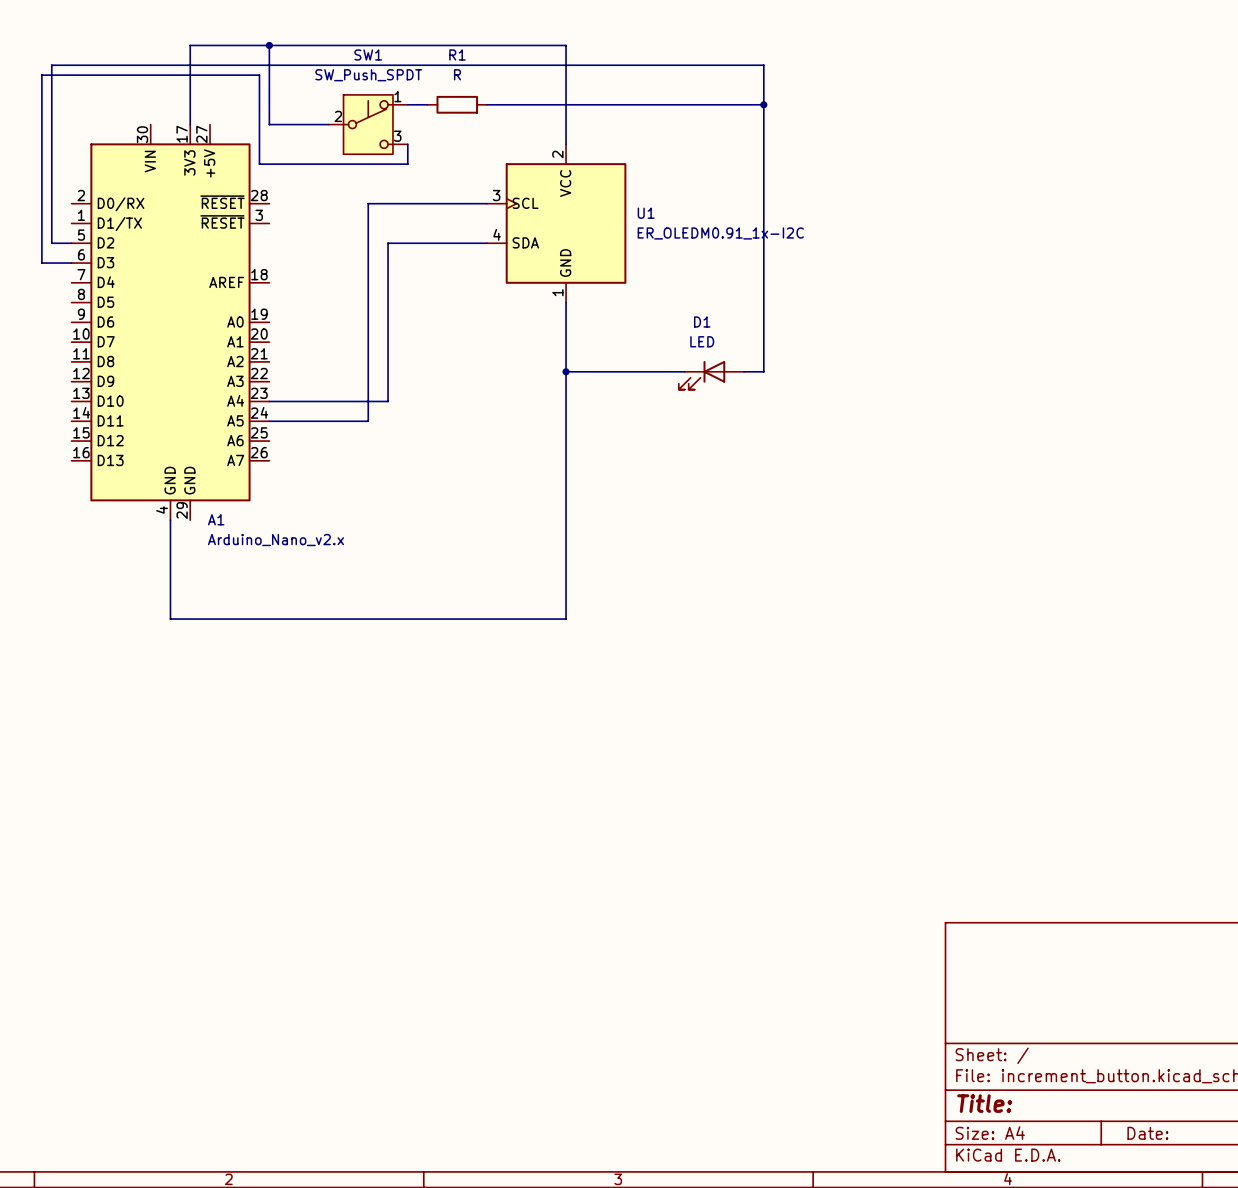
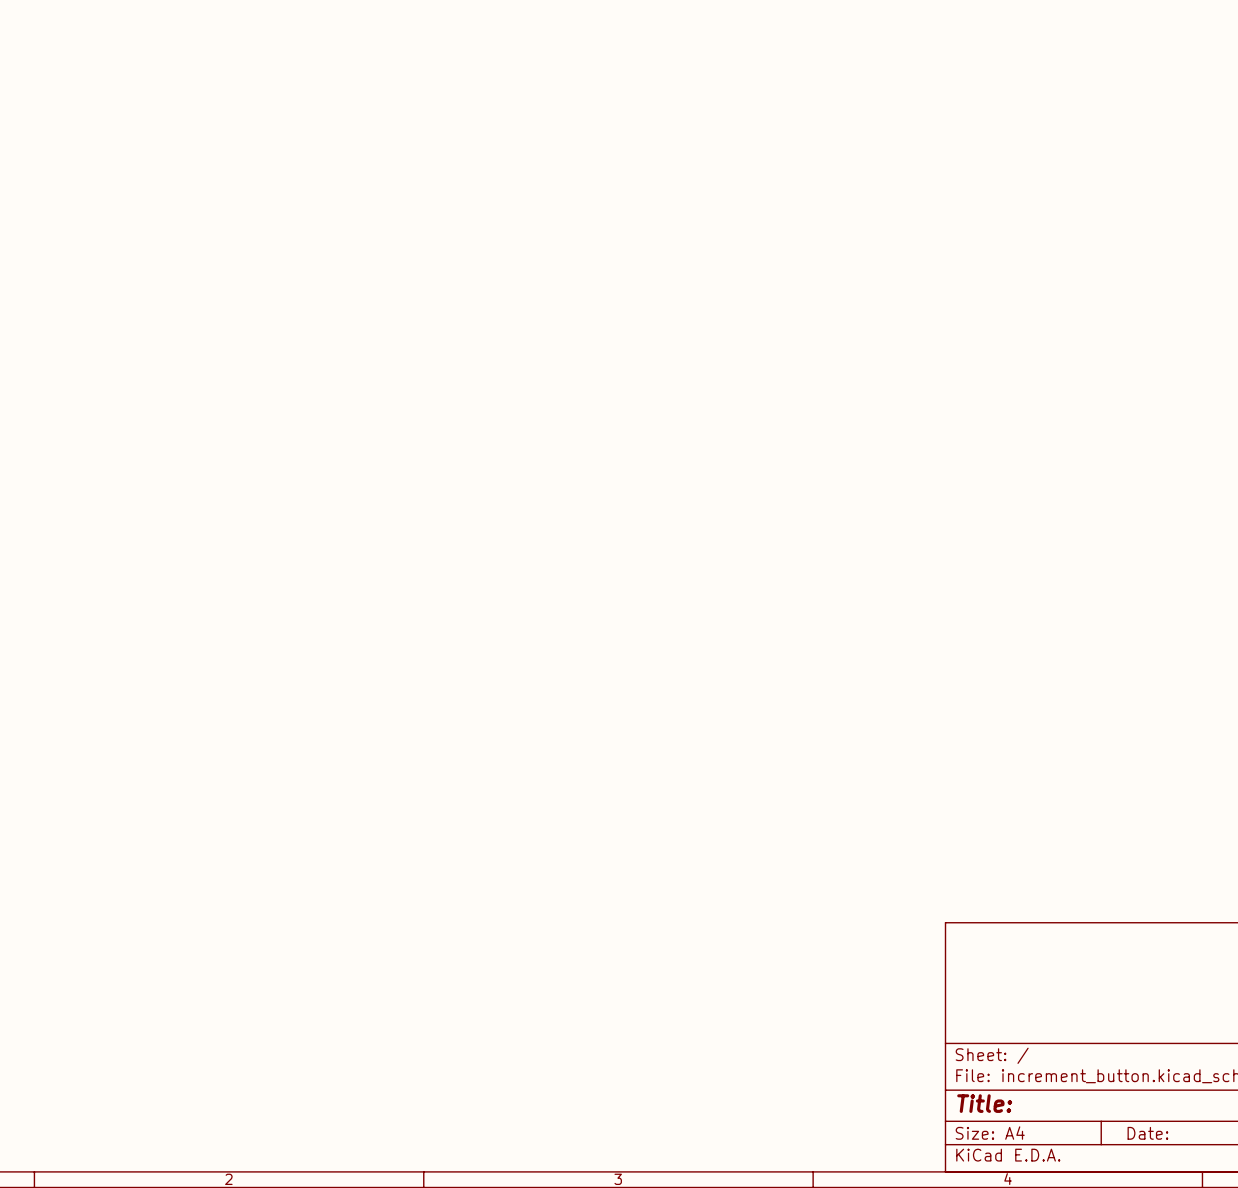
wire: (269, 45) (269, 124) (328, 124) -> none
junction: (269, 45) -> none
wire: (407, 104) (427, 104) -> none
R1: R (457, 104) -> none
wire: (486, 104) (763, 104) -> none
junction: (763, 104) -> none
wire: (190, 124) (190, 45) (566, 45) (566, 144) -> none
SW1: SW_Push_SPDT (368, 124) -> none
wire: (407, 144) (407, 164) (259, 164) (259, 75) (41, 75) (41, 263) (71, 263) -> none
wire: (486, 203) (368, 203) (368, 421) (269, 421) -> none
U1: ER_OLEDM0.91_1x-I2C (556, 223) -> none
wire: (71, 243) (51, 243) (51, 65) (763, 65) (763, 371) (744, 371) -> none
wire: (486, 243) (388, 243) (388, 401) (269, 401) -> none
wire: (566, 302) (566, 619) (170, 619) (170, 520) -> none
A1: Arduino_Nano_v2.x (170, 322) -> none
wire: (566, 371) (684, 371) -> none
junction: (566, 371) -> none
D1: LED (711, 375) -> none

